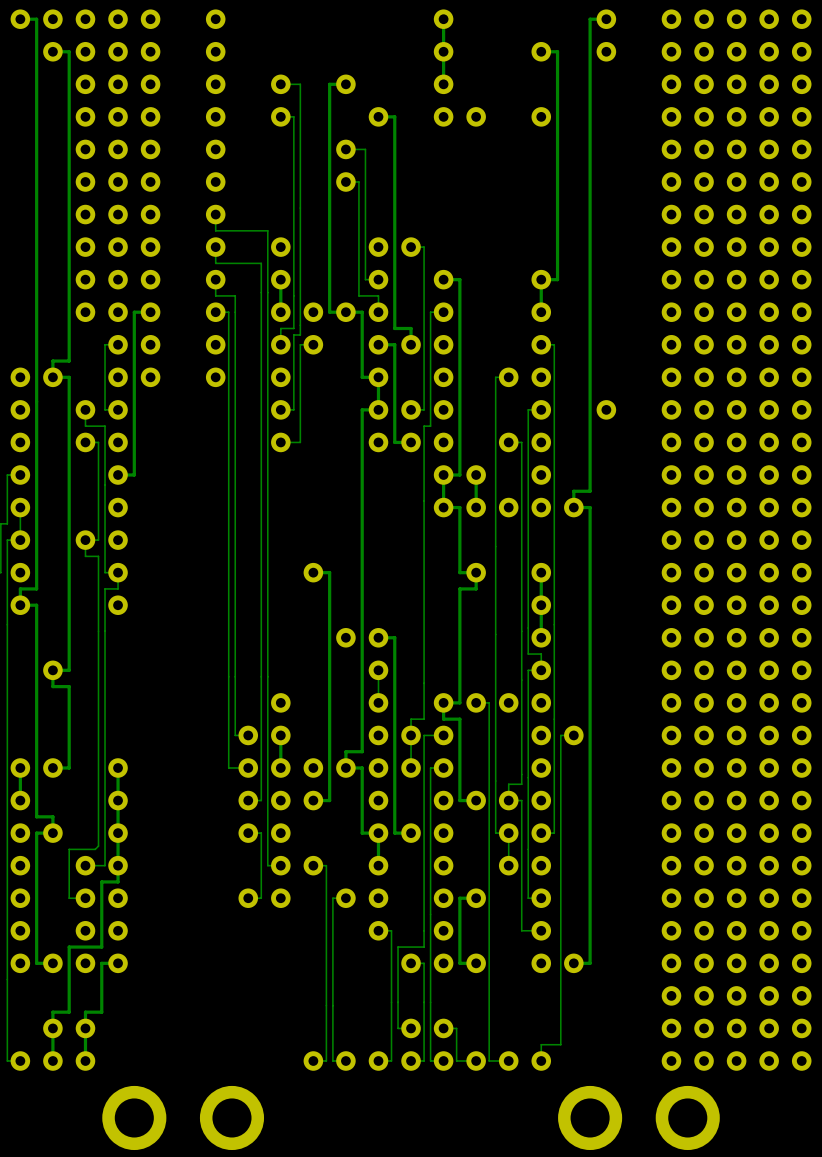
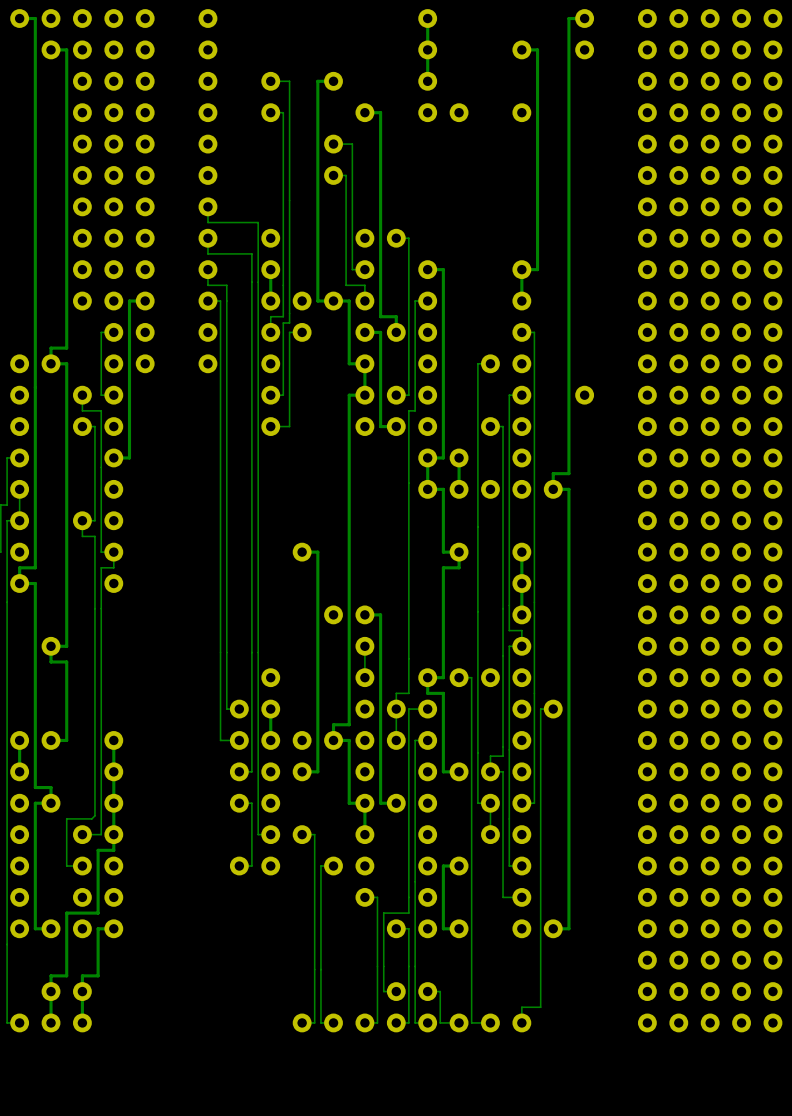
part: (134, 1117) -> none
part: (231, 1117) -> none
part: (590, 1117) -> none
part: (687, 1117) -> none

